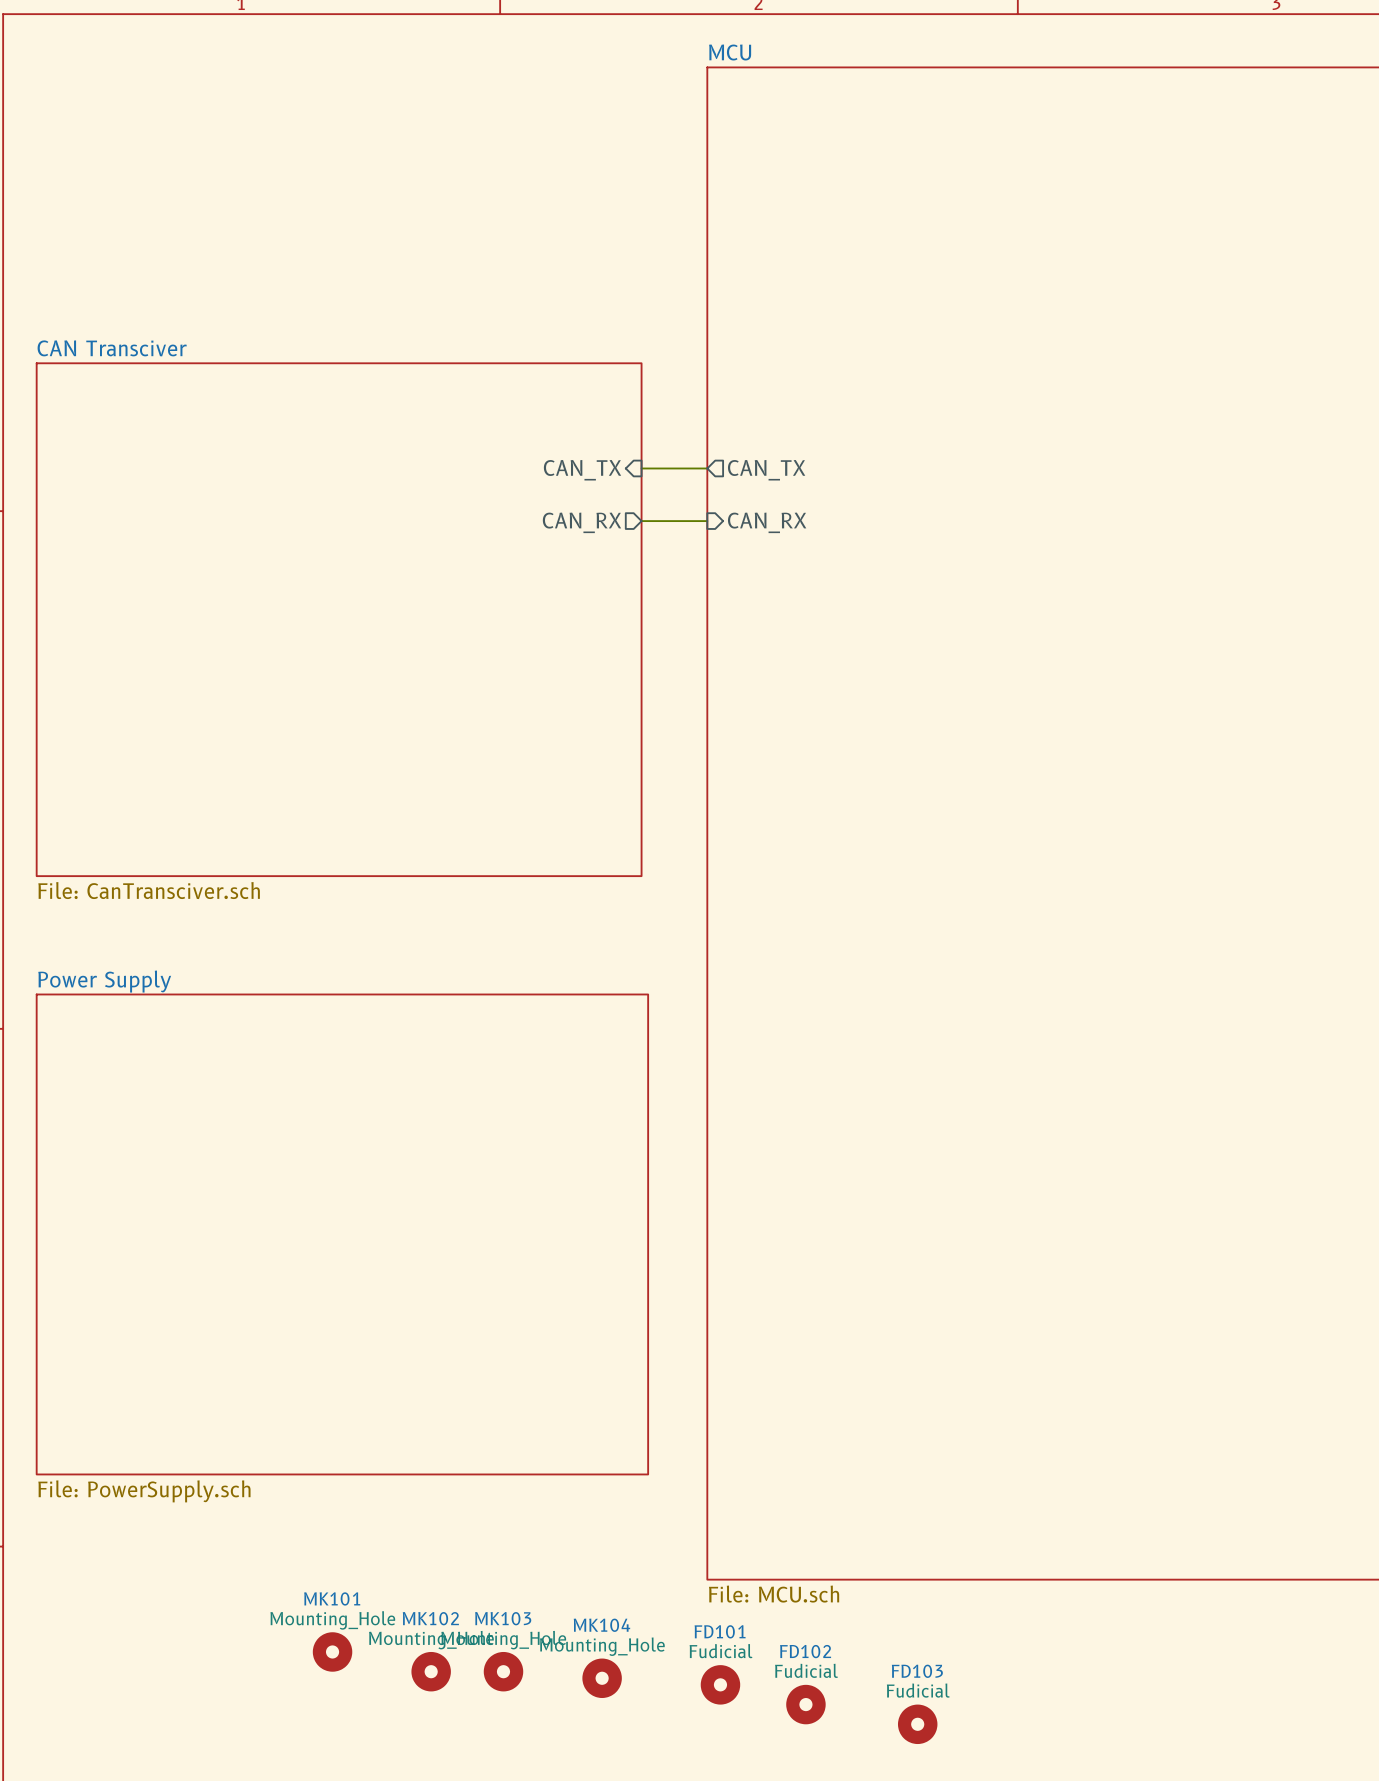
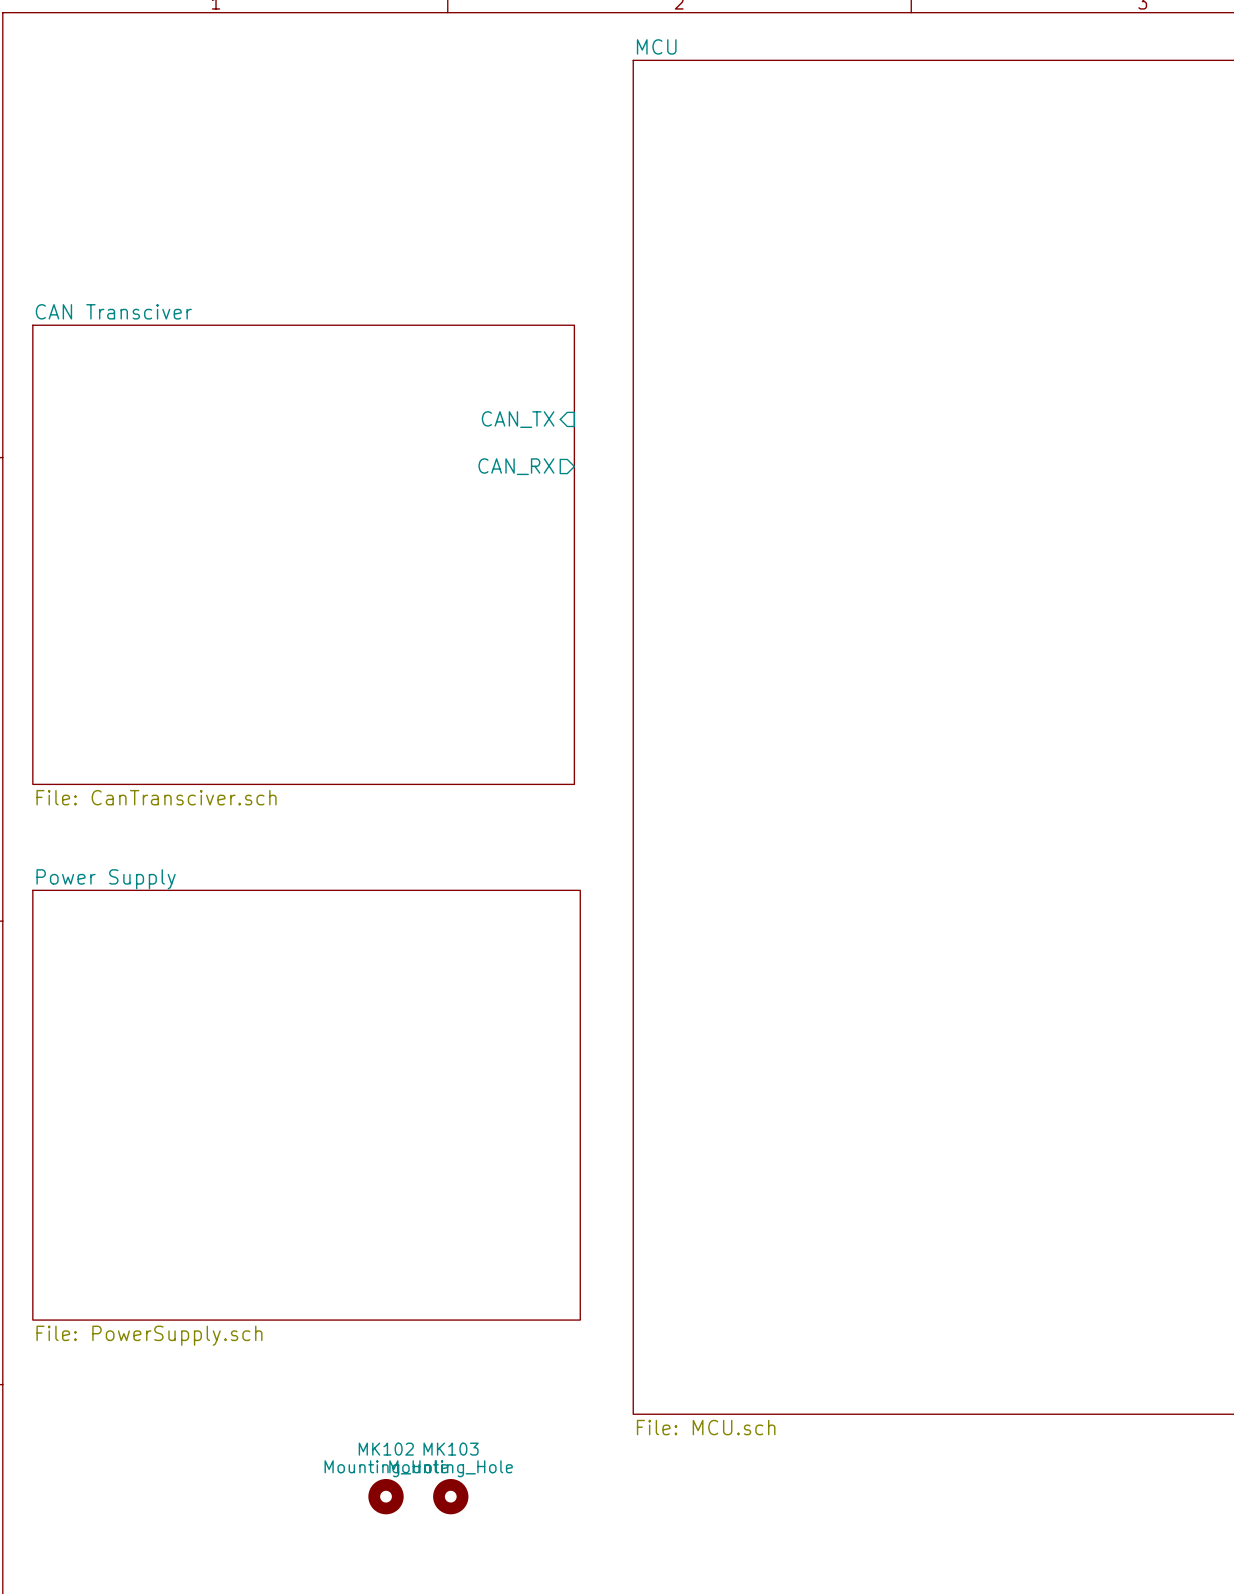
wire: (641, 468) (707, 468) -> none
sheet pin: CAN_TX (766, 470) -> none
wire: (641, 521) (707, 521) -> none
sheet pin: CAN_RX (767, 522) -> none
MK101: Mounting_Hole (332, 1651) -> none
MK104: Mounting_Hole (602, 1678) -> none
FD101: Fudicial (720, 1684) -> none
FD102: Fudicial (805, 1704) -> none
FD103: Fudicial (917, 1724) -> none

